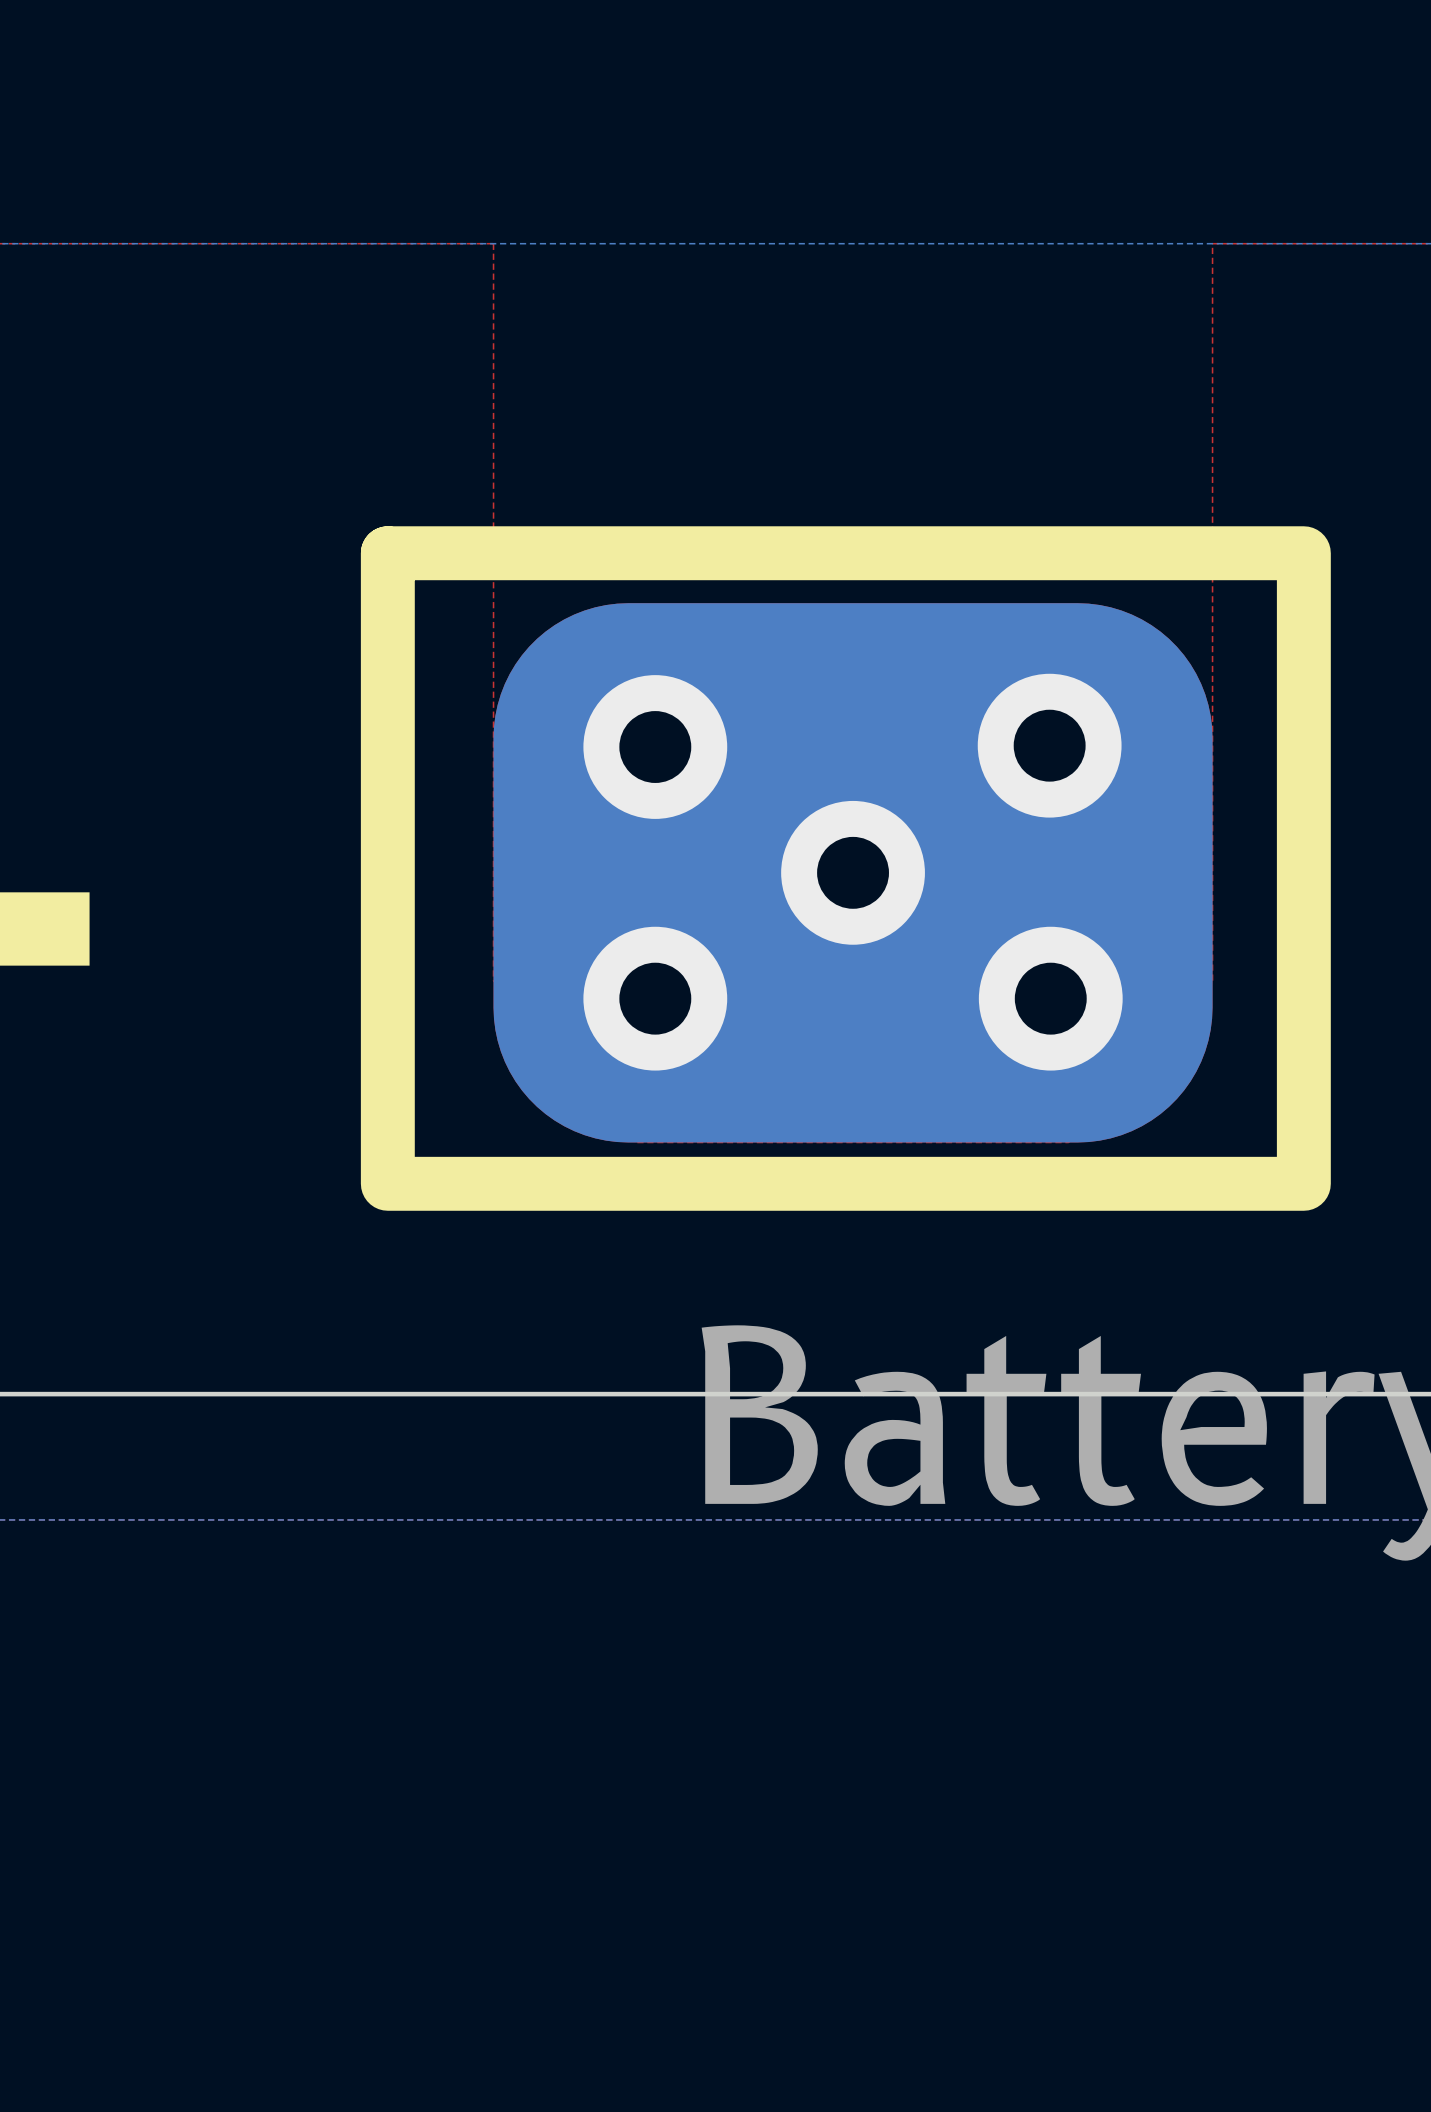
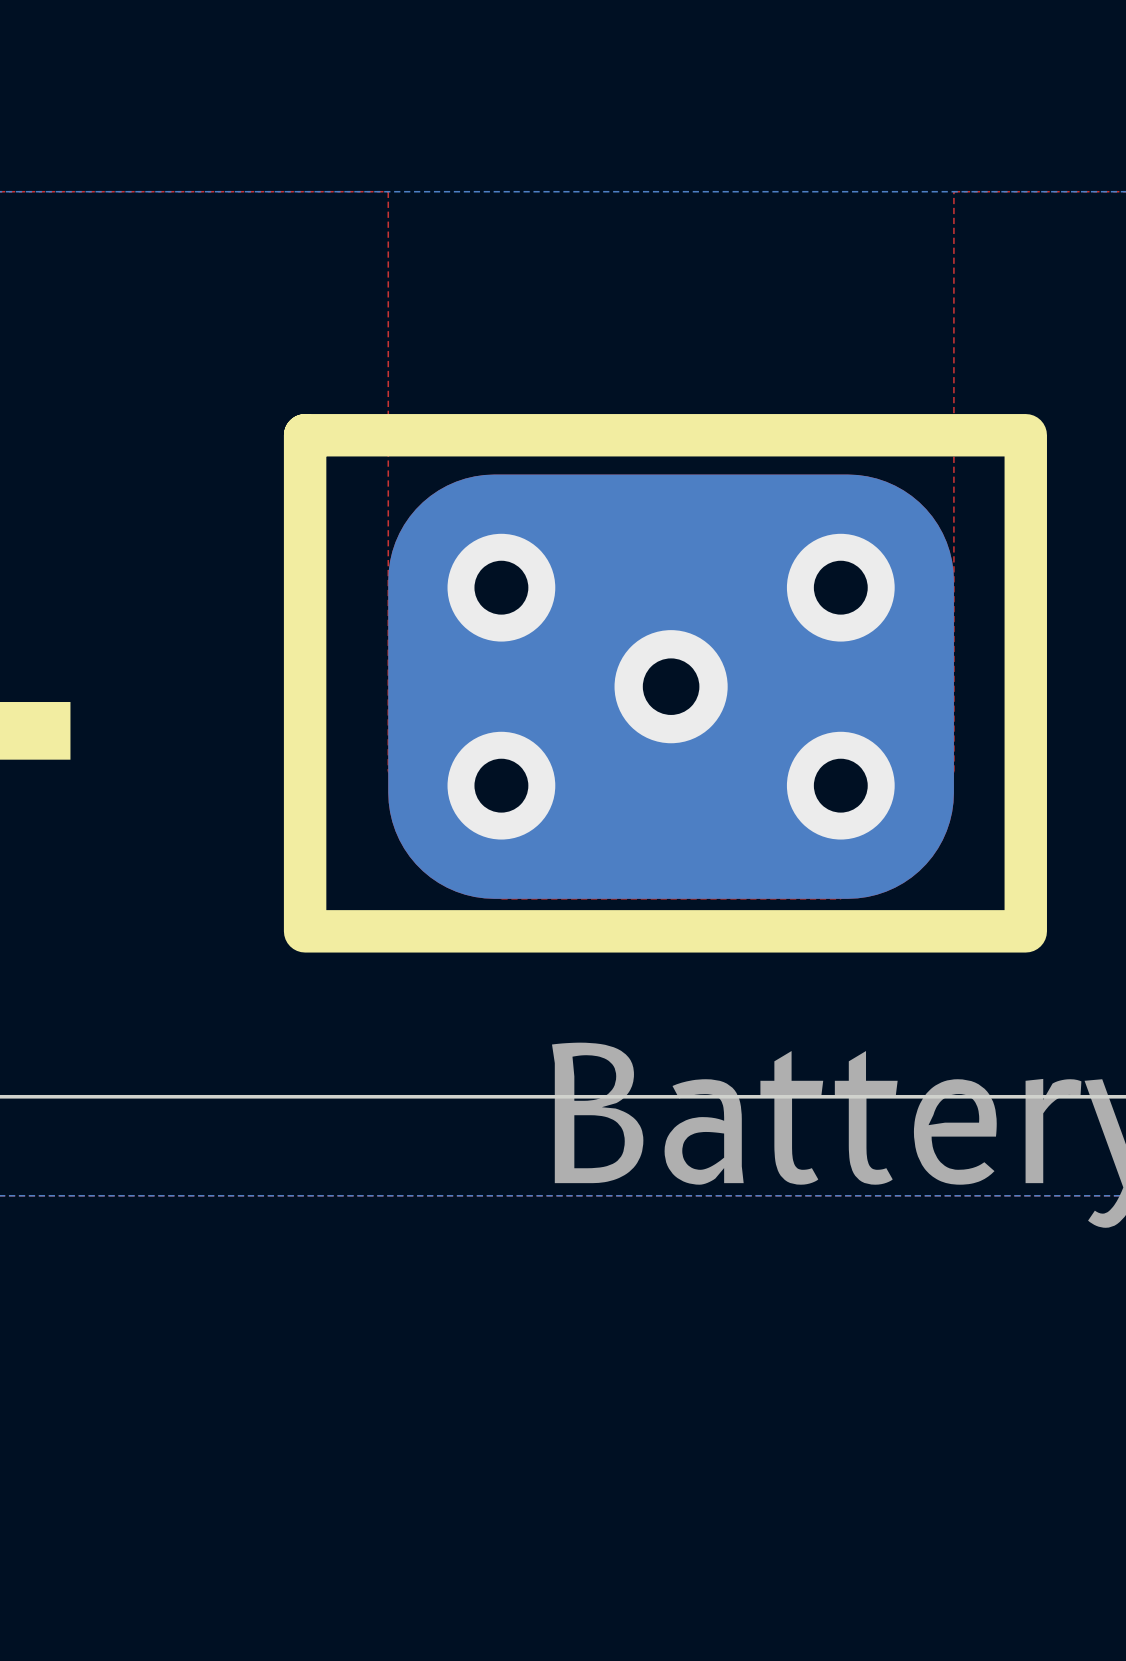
via position: (1049, 745) -> (840, 587)
via position: (655, 747) -> (501, 587)
via position: (655, 998) -> (501, 785)
via position: (1050, 998) -> (840, 785)

